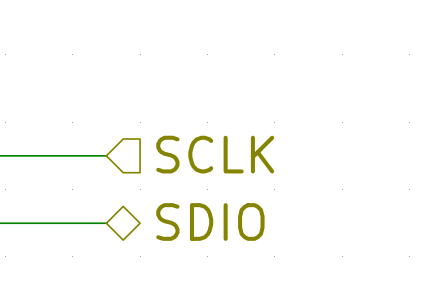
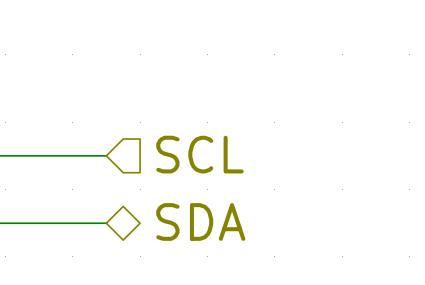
hierarchical label: SCLK (215, 154) -> SCL (199, 154)
hierarchical label: SDIO (210, 221) -> SDA (200, 221)

